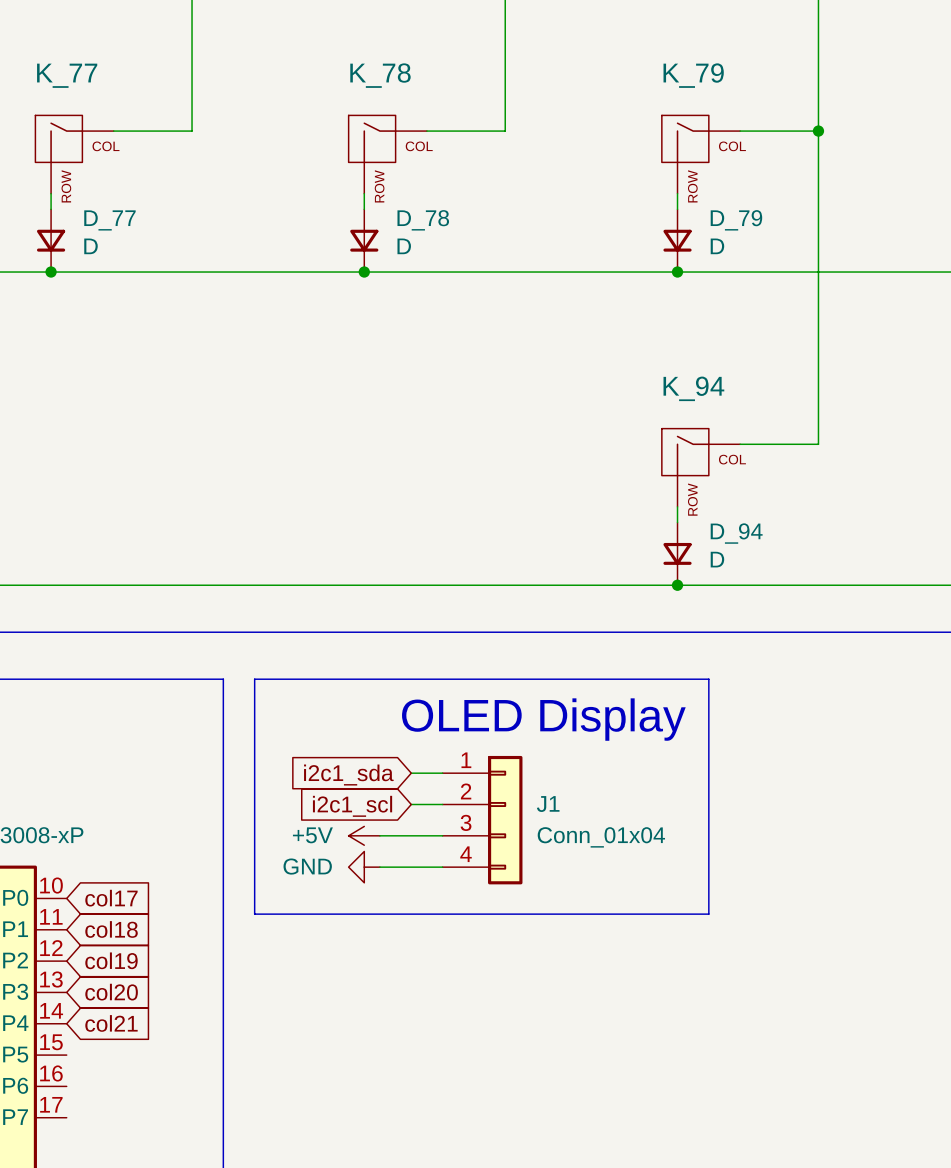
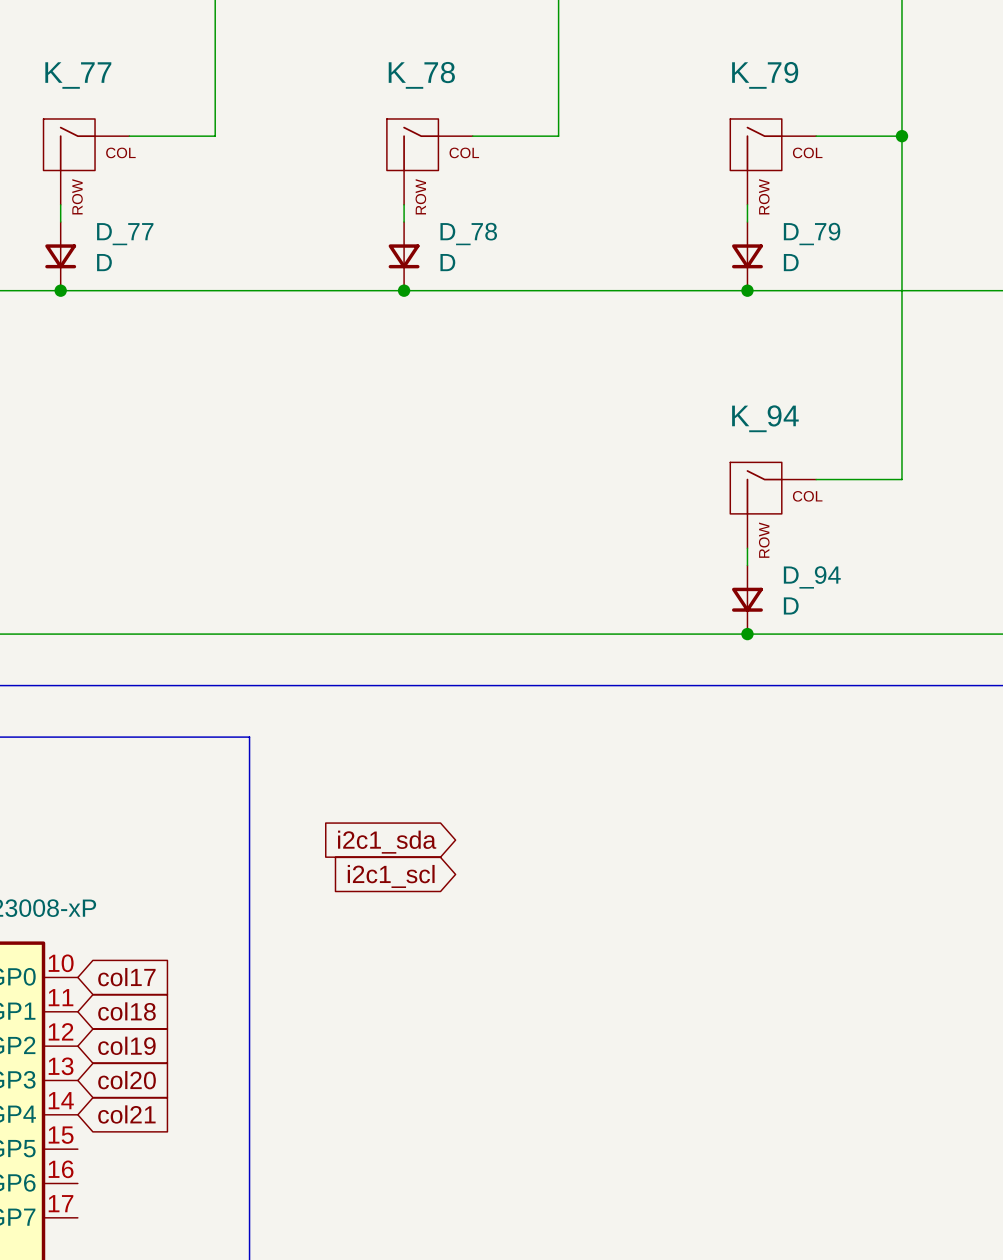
line: (254, 679) (708, 679) (708, 914) (254, 914) (254, 679) -> none
text: OLED Display (543, 719) -> none
wire: (411, 773) (442, 773) -> none
wire: (411, 804) (442, 804) -> none
J1: Conn_01x04 (482, 820) -> none
power symbol: +5V (364, 835) -> none
wire: (379, 835) (442, 835) -> none
power symbol: GND (364, 867) -> none
wire: (379, 867) (442, 867) -> none

